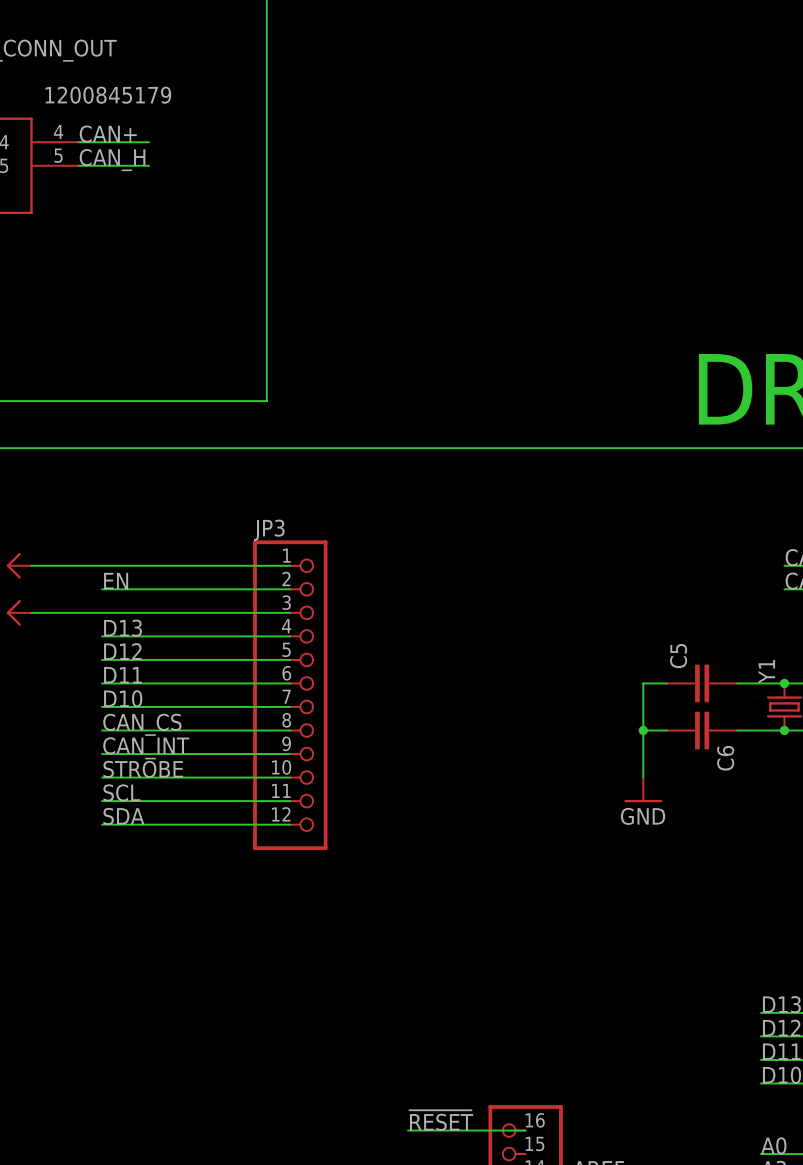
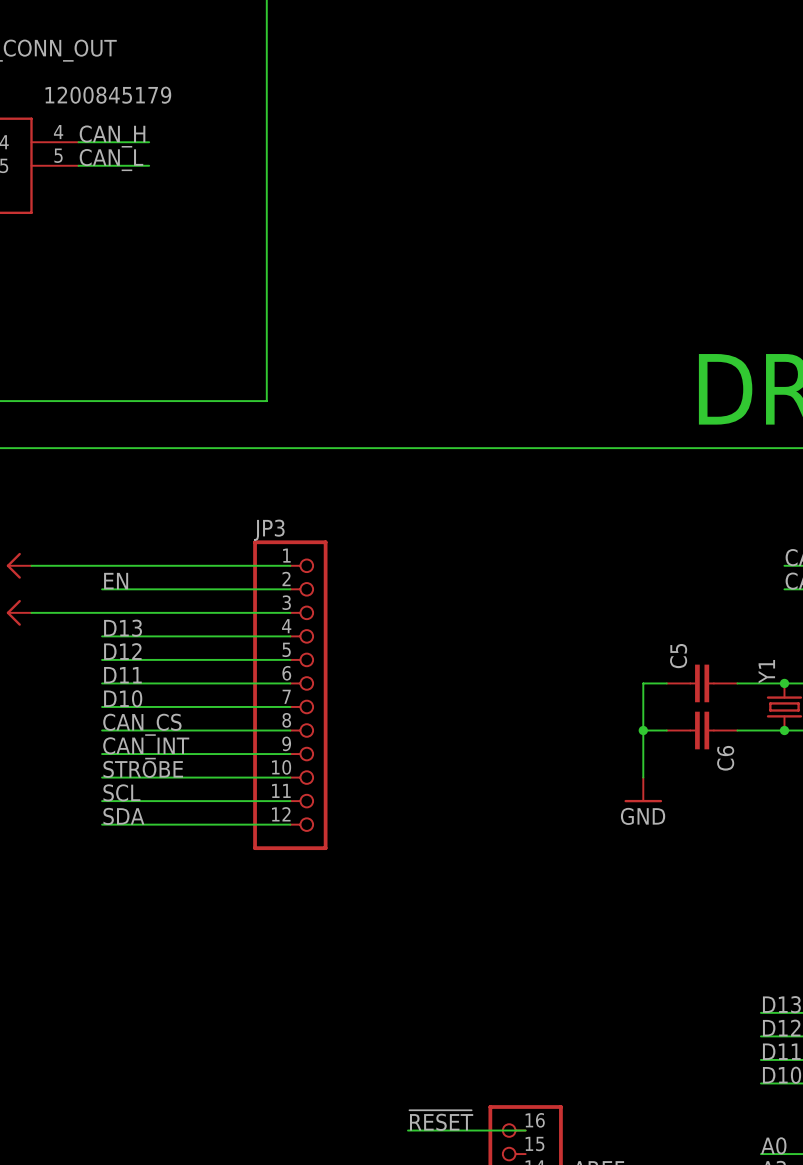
label: CAN+ (108, 134) -> CAN_H (112, 136)
label: CAN_H (112, 160) -> CAN_L (111, 160)

